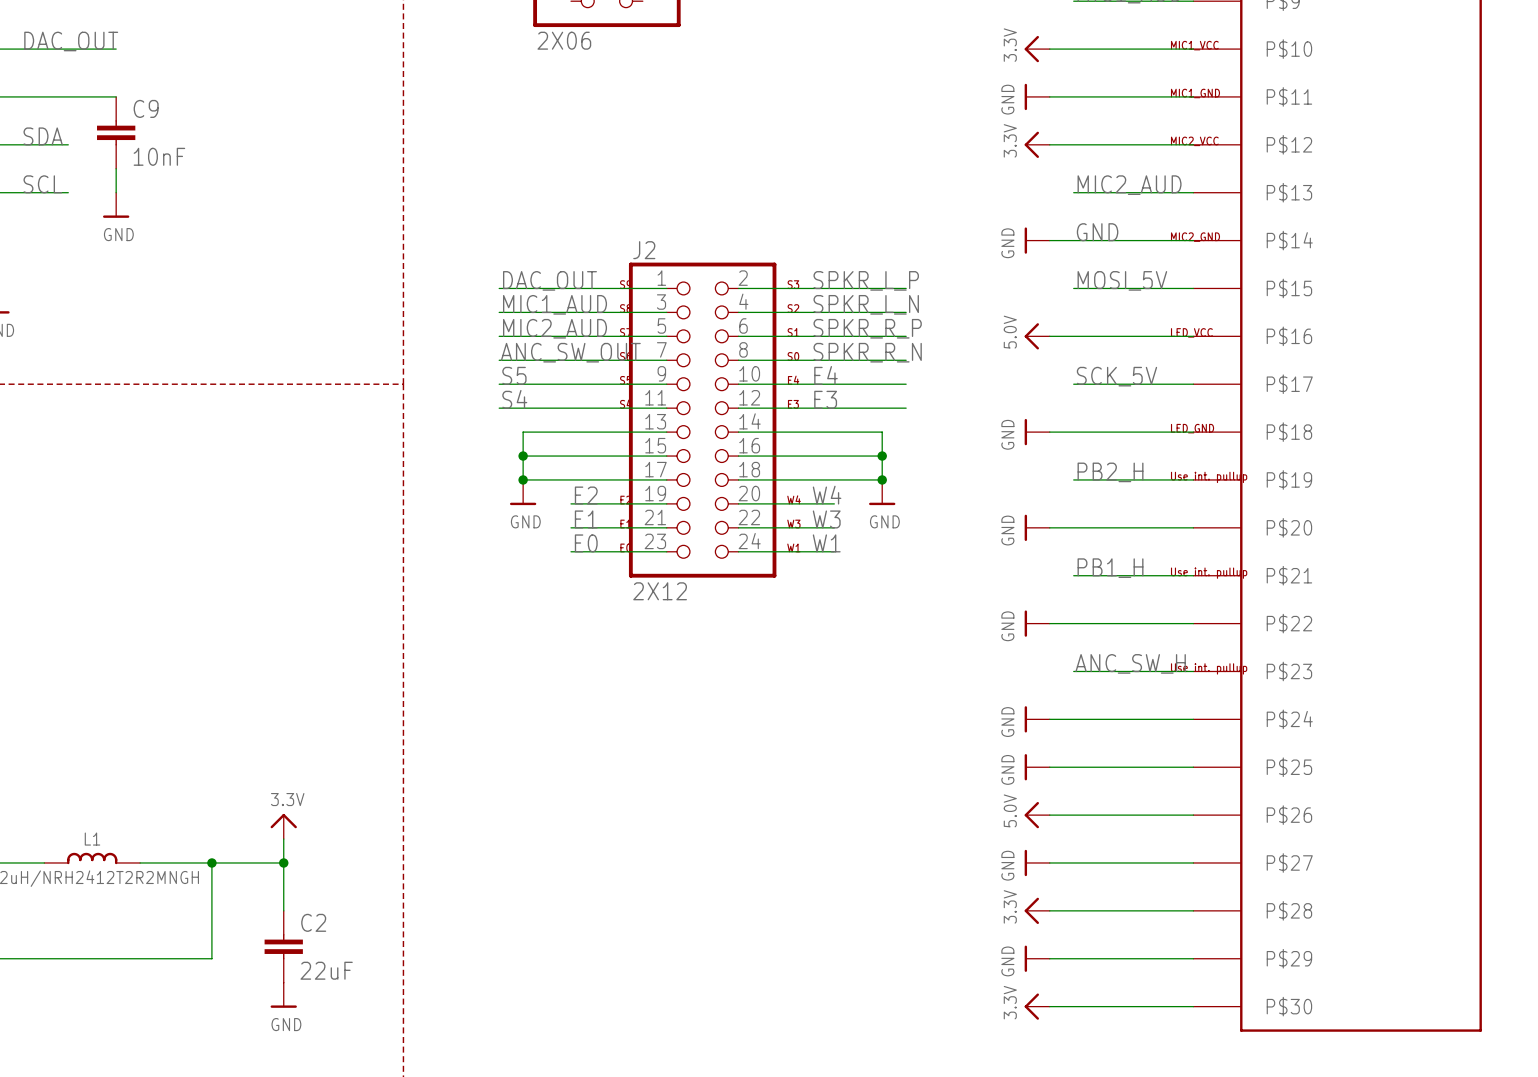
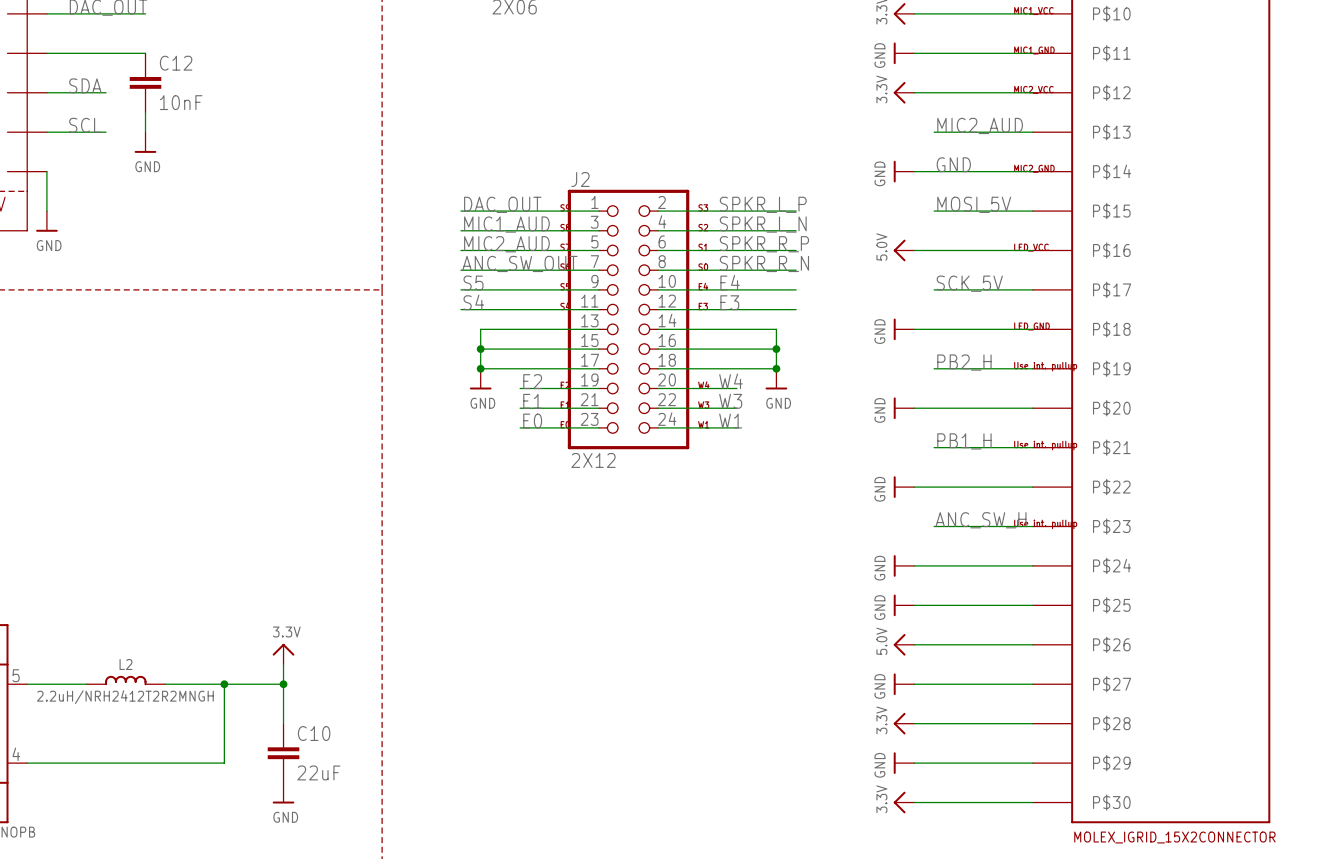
C9 name: C9 (146, 108) -> C12 (176, 63)
L1 name: L1 (92, 839) -> L2 (126, 664)
C2 name: C2 (313, 922) -> C10 (314, 733)
part value: none -> MOLEX_IGRID_15X2CONNECTOR (1174, 837)

